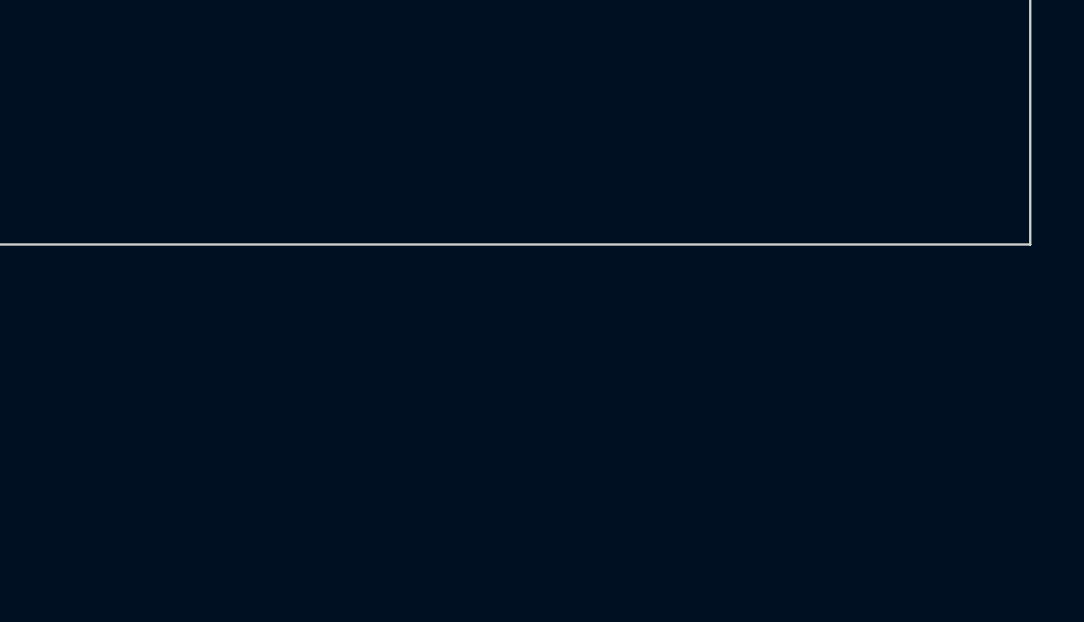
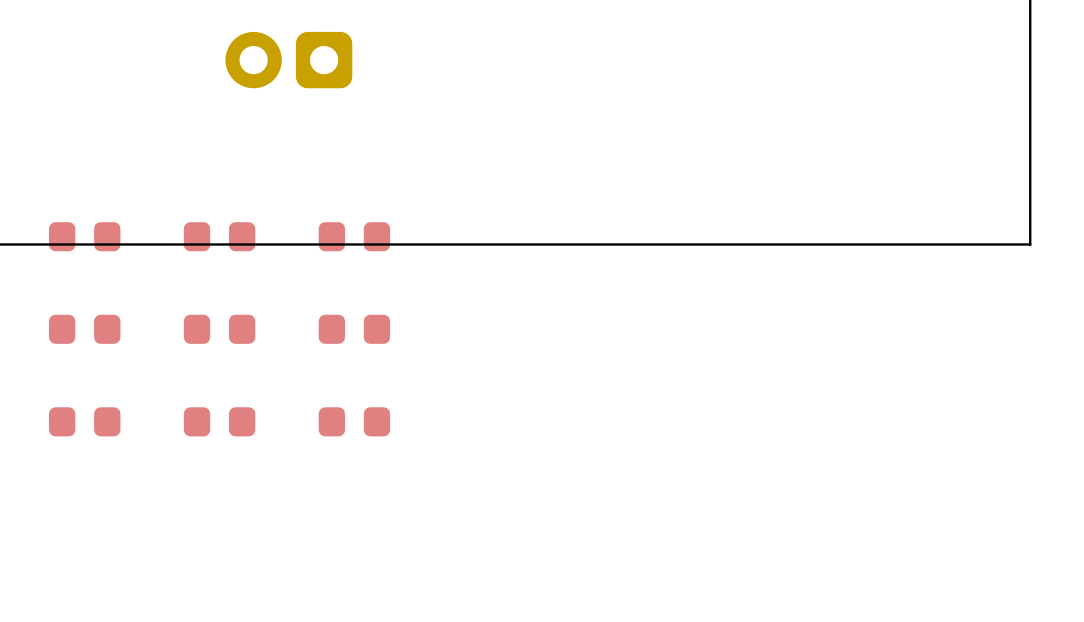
part: none -> (288, 60)
part: none -> (84, 236)
part: none -> (219, 236)
part: none -> (354, 236)
part: none -> (84, 329)
part: none -> (219, 329)
part: none -> (354, 329)
part: none -> (84, 421)
part: none -> (219, 421)
part: none -> (354, 421)

